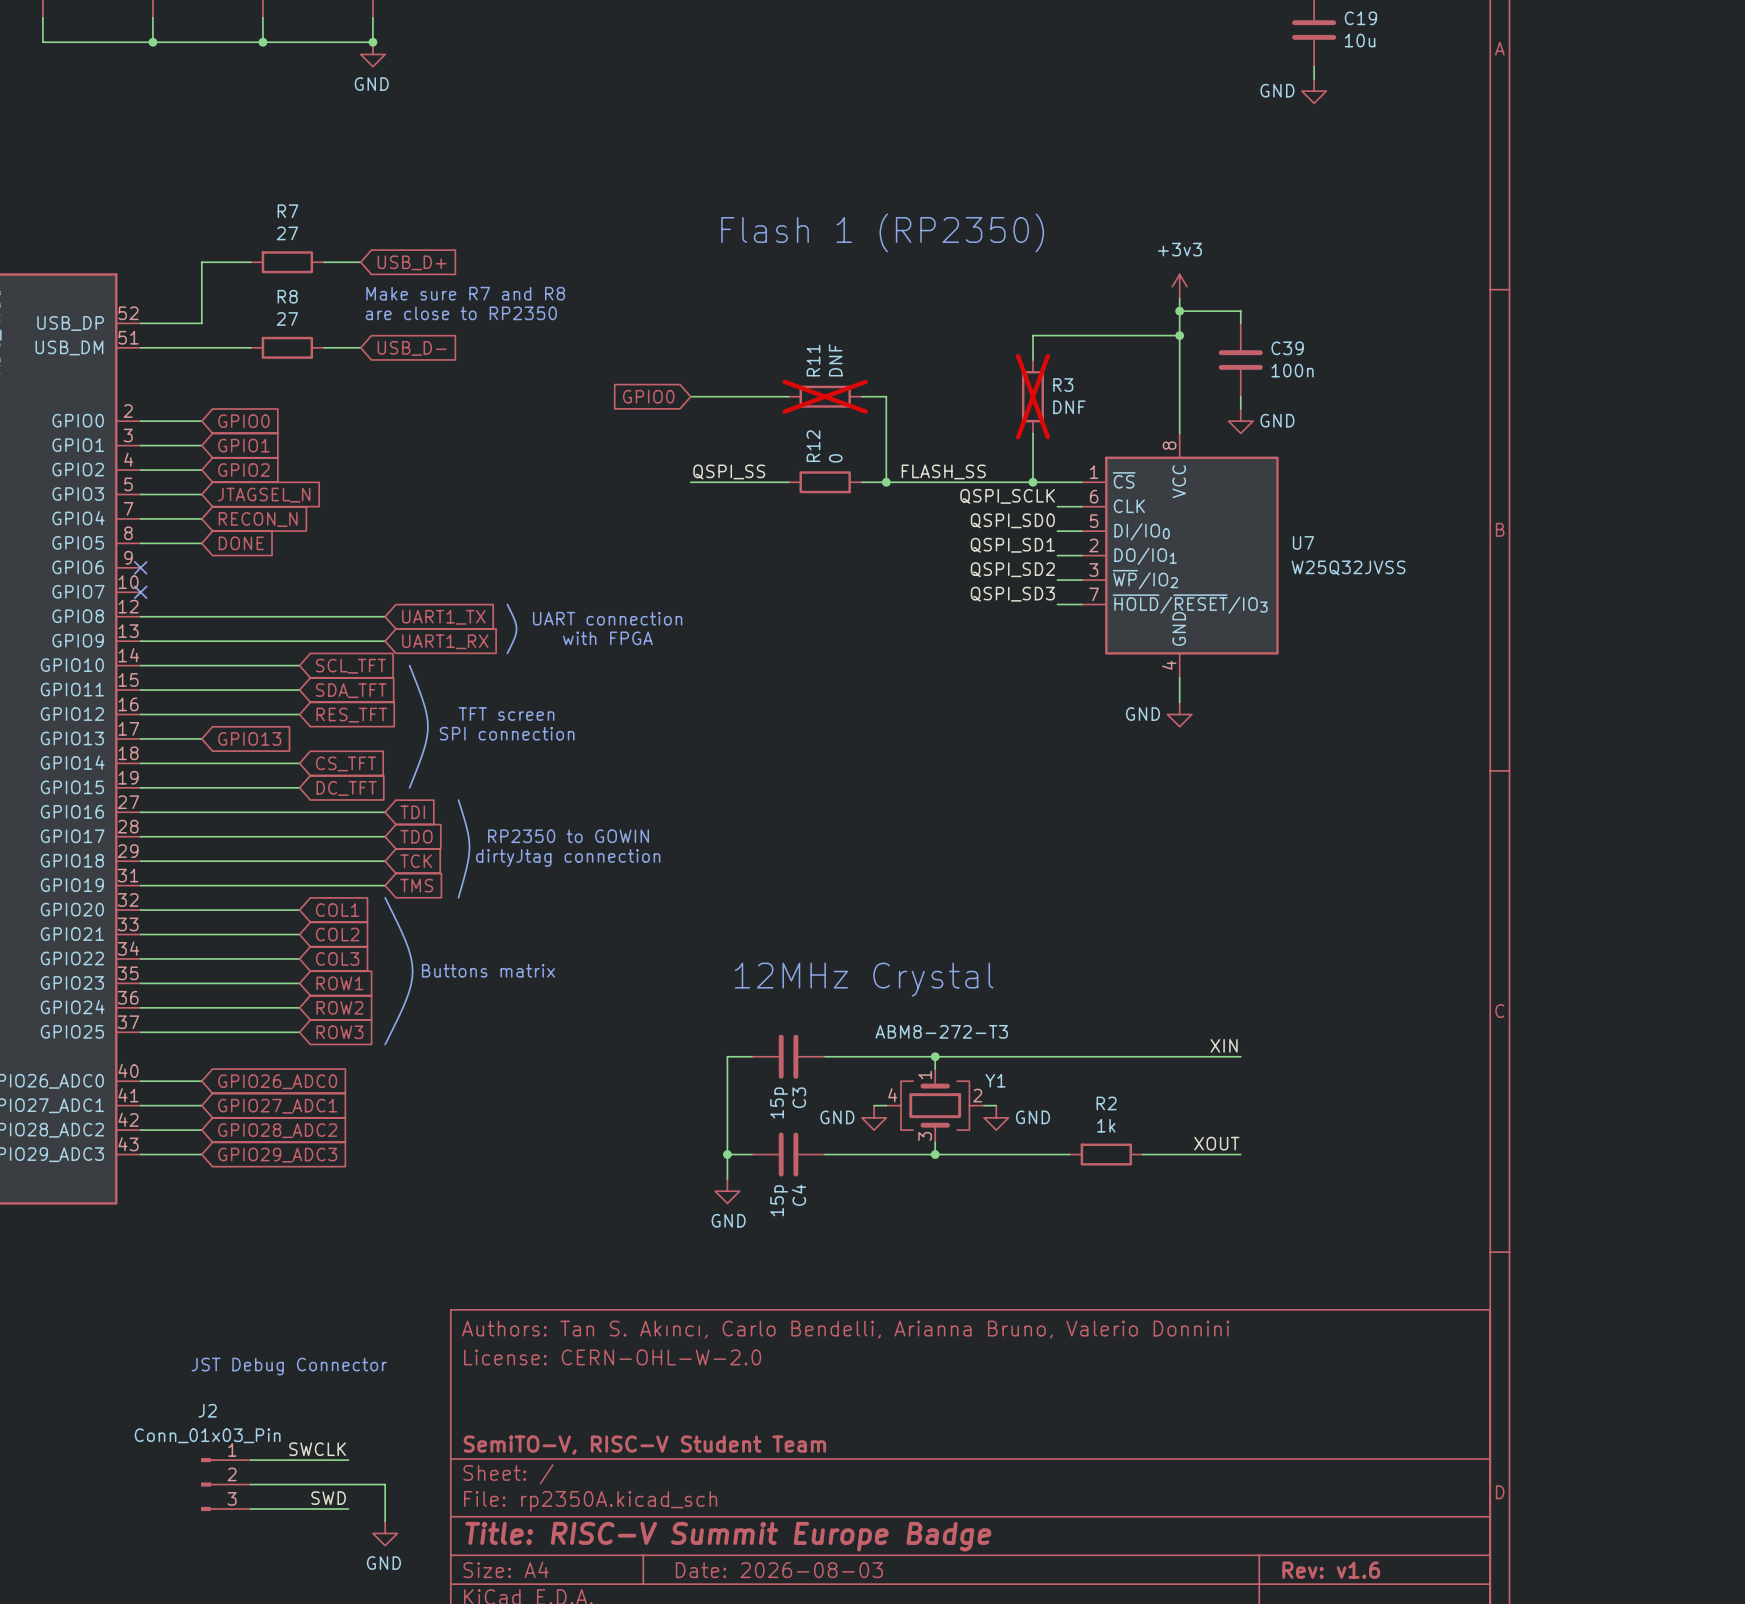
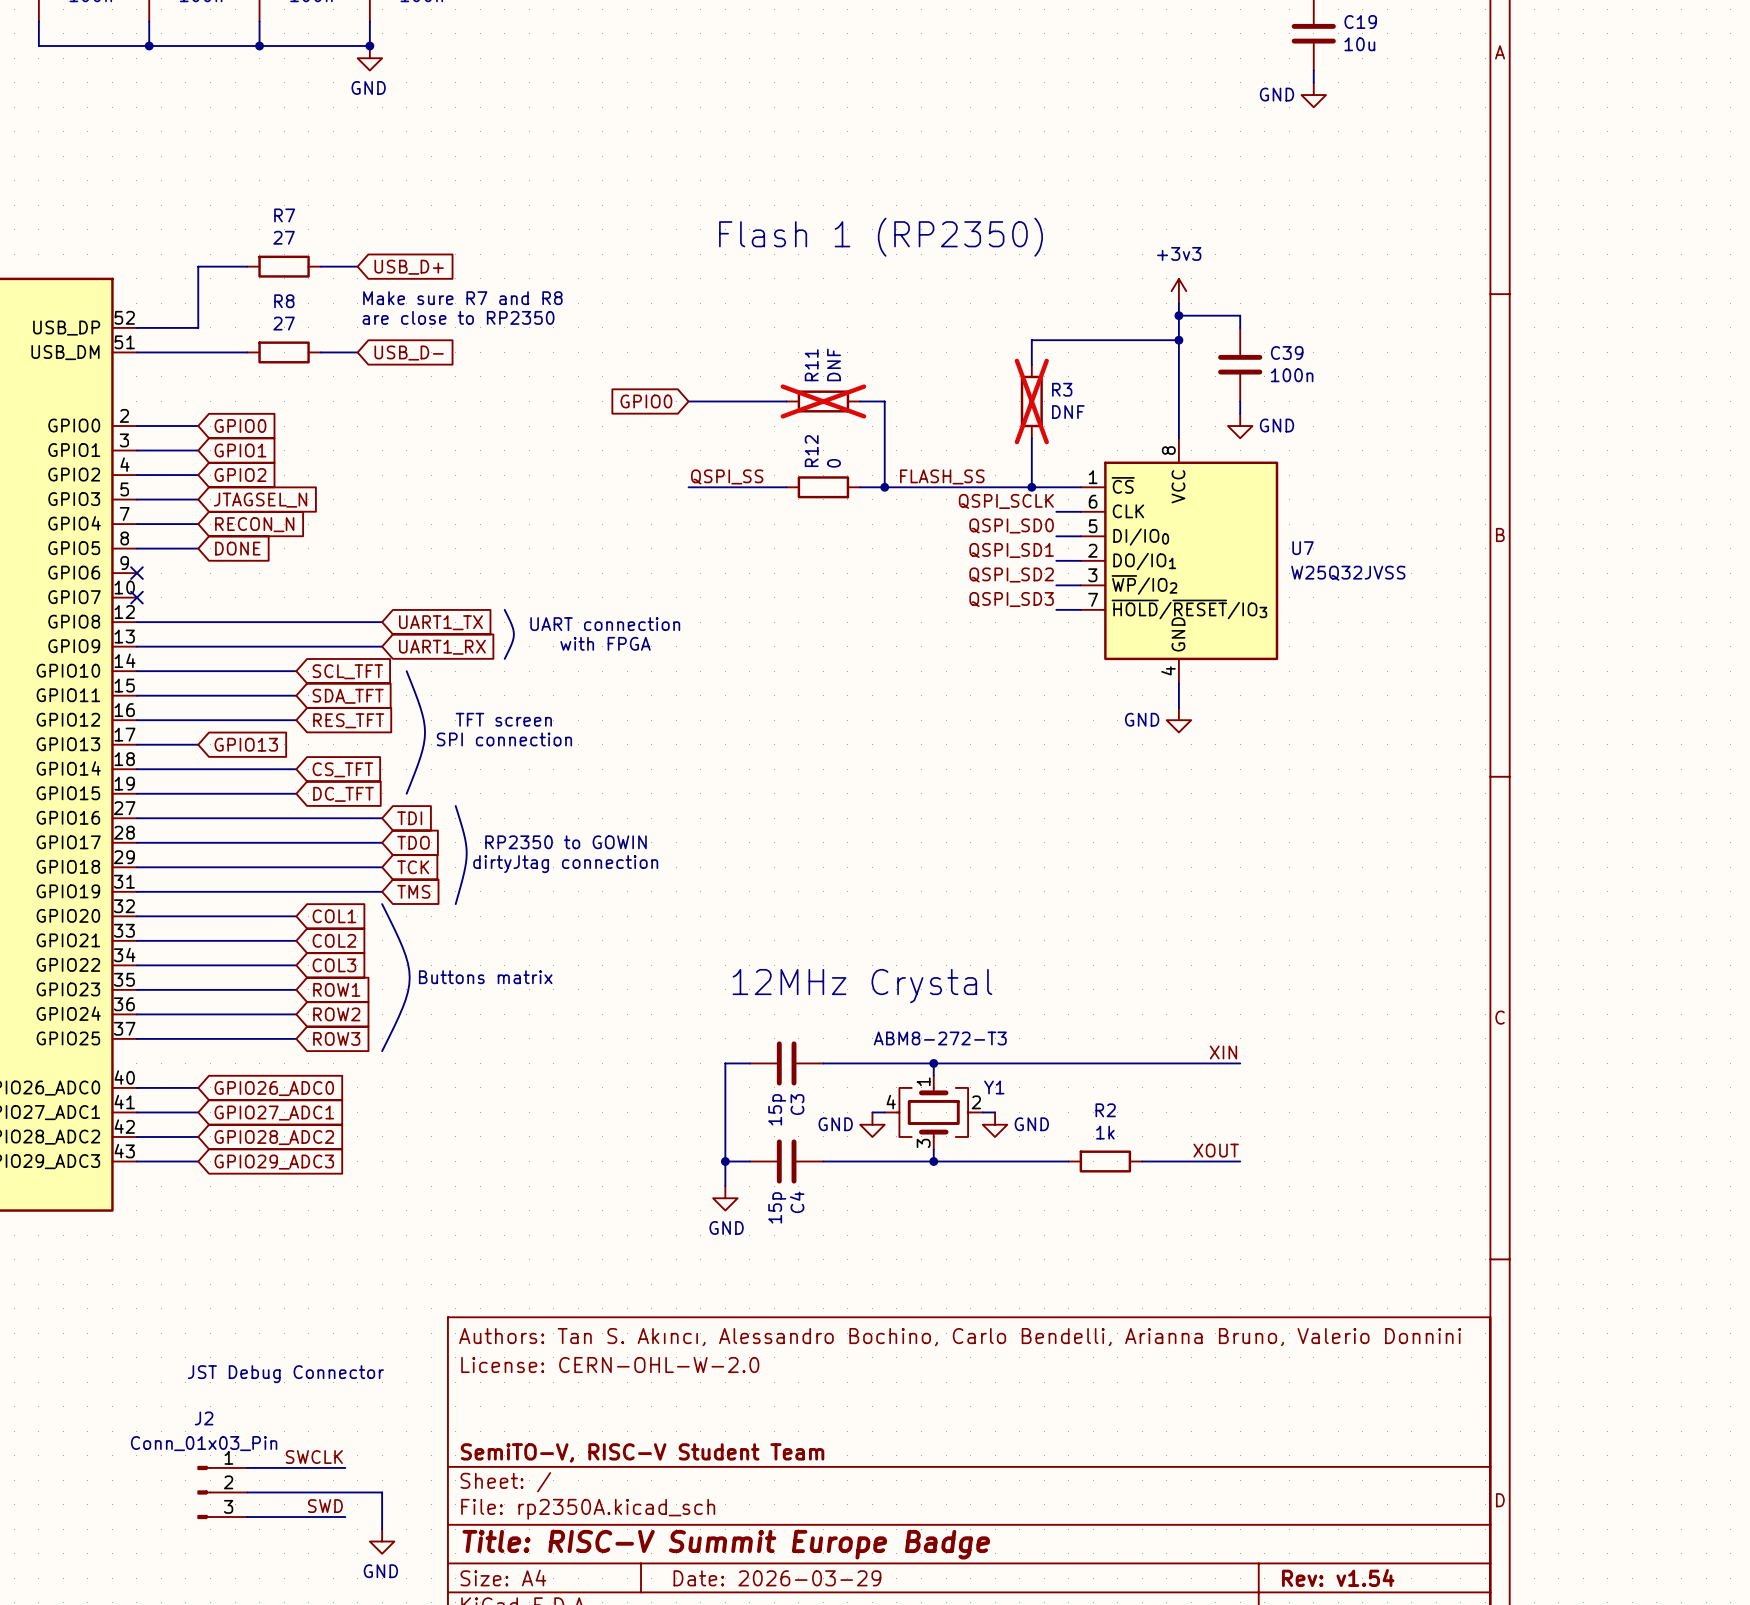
title block: Authors: Tan S. Akıncı, Carlo Bendelli, Arianna Bruno, Valerio Donnini (845, 1329) -> Authors: Tan S. Akıncı, Alessandro Bochino, Carlo Bendelli, Arianna Bruno, Valerio Donnini (960, 1337)
title block: Date: 2026-08-03 (779, 1570) -> Date: 2026-03-29 (777, 1578)
title block: Rev: v1.6 (1331, 1570) -> Rev: v1.54 (1338, 1577)

